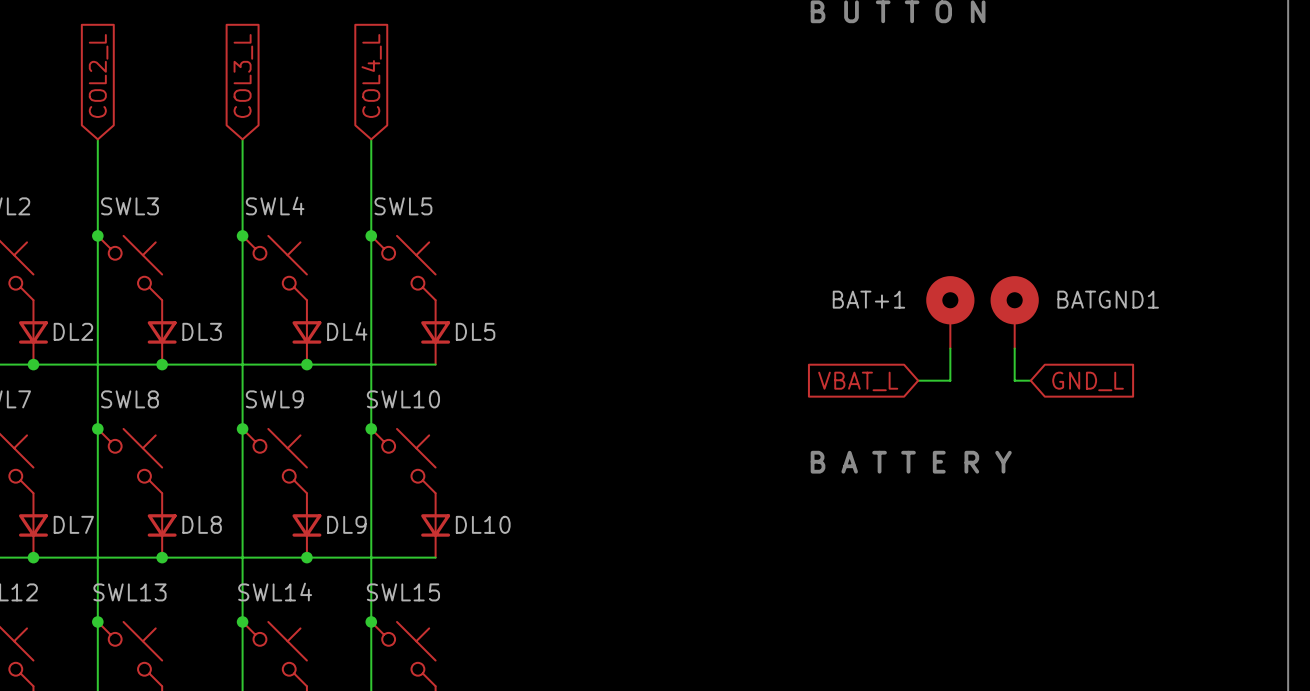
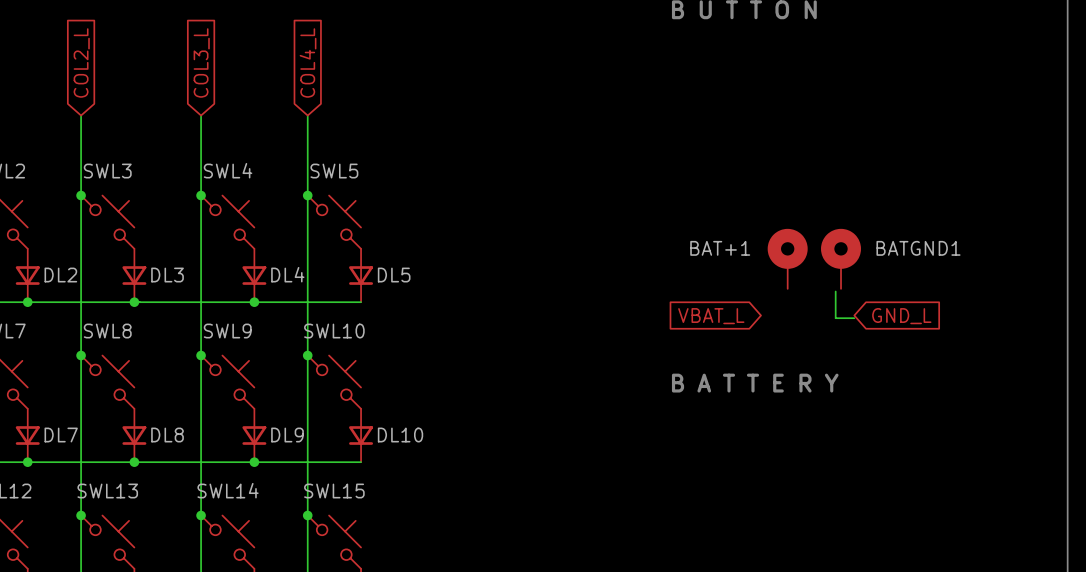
wire: (950, 348) (950, 380) (918, 380) -> none
wire: (1014, 348) (1014, 380) (1030, 380) -> none
wire: none -> (835, 291) (835, 318) (854, 318)

